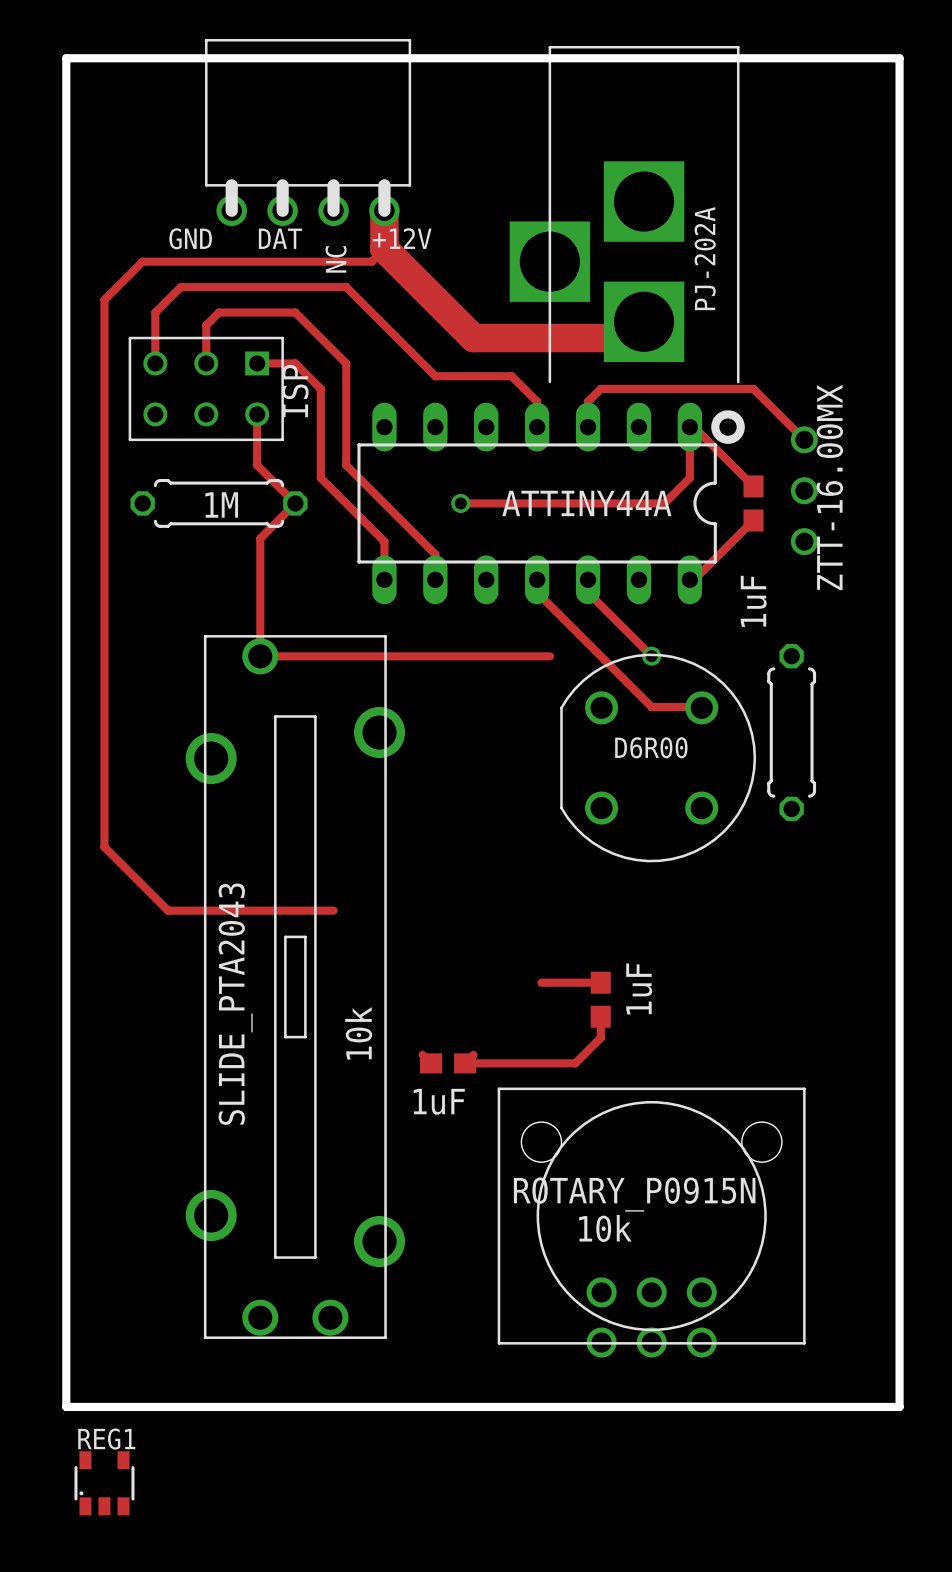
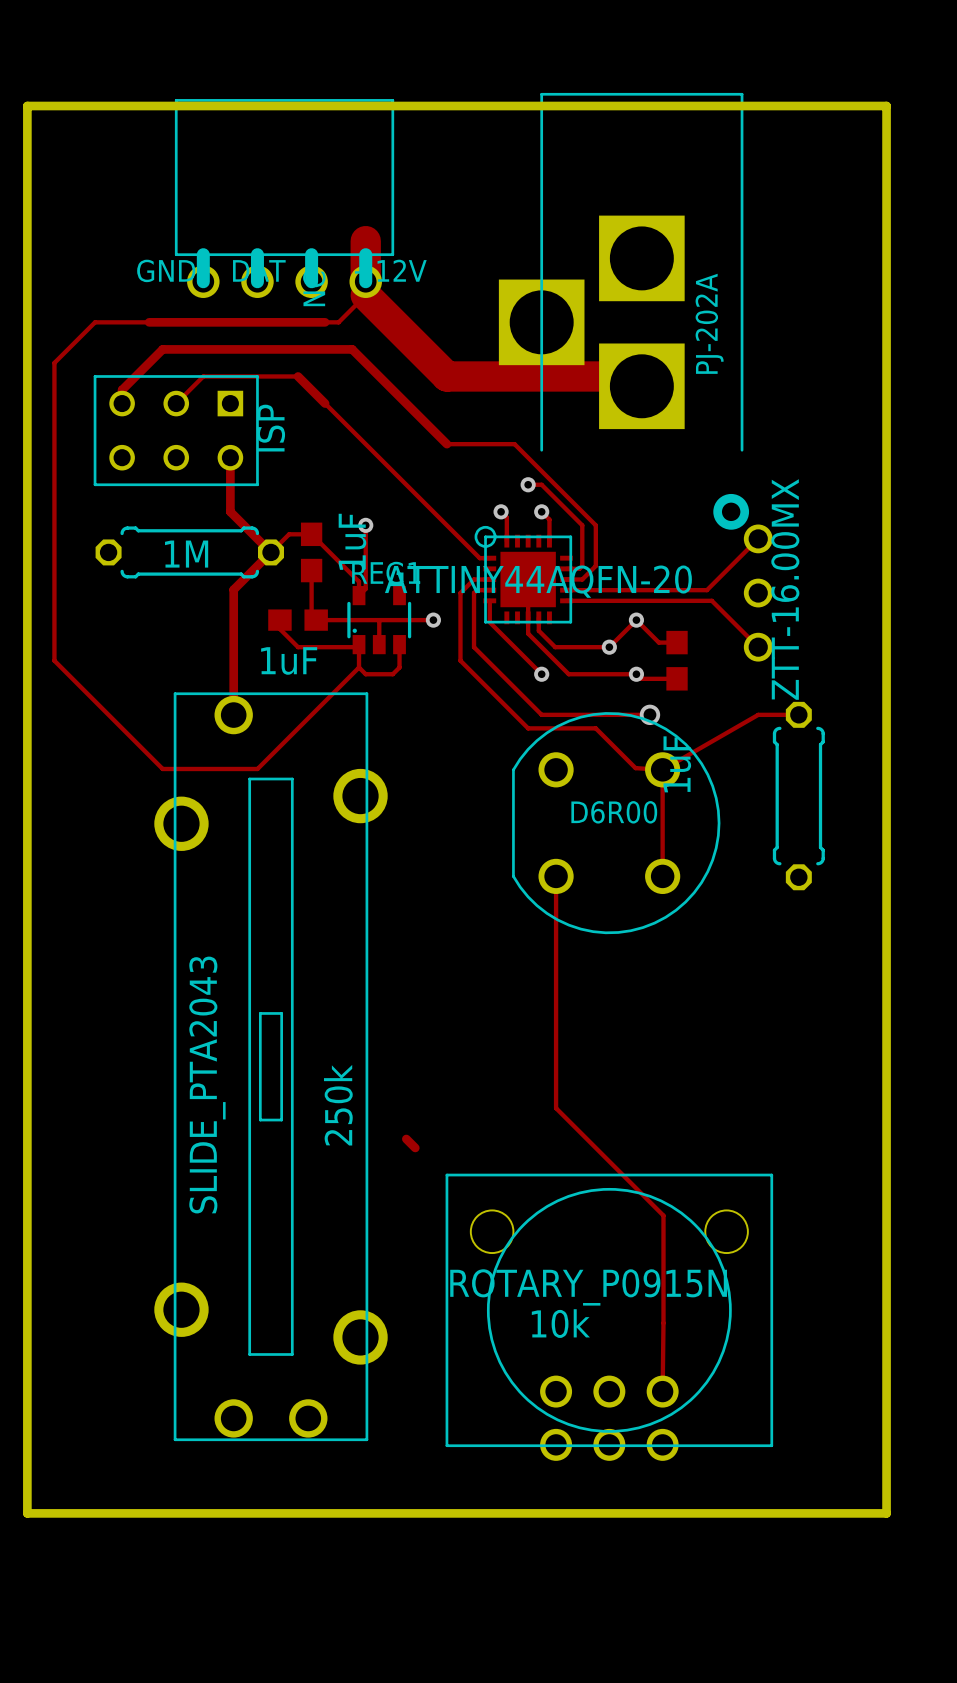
board edge: (66, 83) (66, 58) (899, 58) (899, 1406) (874, 1406) -> (27, 106) (886, 106) (886, 1513)
part position: (308, 132) -> (284, 198)
part position: (624, 214) -> (621, 272)
track: (180, 287) (155, 312) (155, 350) -> (189, 349) (162, 349) (122, 390)
track: none -> (149, 322) (95, 322) (54, 362) (54, 660) (162, 768) (257, 768) (359, 667)
track: (346, 287) (371, 312) -> (325, 322) (338, 322) (365, 295) (446, 376) (460, 376)
track: (219, 312) (206, 325) (206, 363) -> (298, 376) (203, 376) (176, 403)
track: (295, 312) (320, 338) -> (270, 349) (352, 349)
track: (473, 338) (384, 248) (371, 261) (142, 261) (104, 299) (104, 847) (168, 910) (333, 910) -> none
track: (257, 363) (295, 363) (320, 388) (320, 478) (384, 541) (384, 579) -> none
track: (346, 363) (346, 465) (435, 554) (435, 579) -> (325, 403) (479, 558) (489, 558)
track: (435, 376) (511, 376) (537, 401) (537, 427) -> (419, 417) (446, 444) (514, 444) (595, 525) (595, 565) (582, 579) (566, 579)
track: (588, 427) (588, 401) (600, 388) (753, 388) (804, 439) -> none
drawing position: (728, 427) -> (731, 511)
track: none -> (528, 484) (541, 484) (582, 525) (582, 565) (579, 568) (566, 568)
via: none -> (528, 484)
track: none -> (501, 511) (506, 517) (506, 541)
via: none -> (501, 511)
track: none -> (541, 511) (549, 519) (549, 541)
via: none -> (541, 511)
track: none -> (365, 525) (365, 588) (359, 595) (359, 581) (311, 534) (289, 534) (270, 552)
via: none -> (365, 525)
track: (753, 486) (694, 427) (689, 427) (689, 478) (664, 503) (460, 503) -> none
track: none -> (758, 538) (706, 590) (566, 590)
part position: (804, 490) -> (758, 593)
part: none -> 1uF (311, 552)
via: (460, 503) -> none
part: ATTINY44A (537, 503) -> none
part position: (753, 503) -> (677, 660)
track: none -> (311, 570) (311, 615) (316, 620) (433, 620)
track: (753, 520) (694, 579) (689, 579) -> none
part: none -> ATTINY44AQFN-20 (523, 575)
track: none -> (489, 579) (474, 579) (460, 593) (460, 660) (528, 728) (595, 728) (635, 768) (662, 769)
track: none -> (528, 579) (528, 633) (568, 674) (641, 674)
track: none -> (489, 600) (489, 622) (541, 674)
track: none -> (566, 600) (711, 600) (758, 647)
track: none -> (538, 617) (538, 630) (555, 647) (609, 647) (636, 620) (658, 642) (677, 642)
track: none -> (279, 620) (279, 629) (298, 647) (356, 647) (359, 644) (359, 667)
part: none -> 1uF (298, 620)
track: none -> (379, 620) (379, 644)
via: none -> (433, 620)
via: none -> (636, 620)
track: (537, 579) (537, 592) (651, 707) (700, 707) -> none
track: (588, 579) (588, 592) (651, 656) -> (489, 590) (476, 590) (474, 593) (474, 647) (541, 714) (649, 714)
track: none -> (399, 644) (399, 667) (392, 674) (365, 674) (359, 667)
via: none -> (609, 647)
via: none -> (541, 674)
track: none -> (636, 674) (641, 678) (677, 678)
via: none -> (636, 674)
track: (260, 656) (550, 656) -> none
track: none -> (798, 714) (758, 714) (662, 769)
track: none -> (662, 769) (662, 876)
part position: (658, 757) -> (616, 823)
track: none -> (556, 876) (556, 1108) (663, 1215) (662, 1391)
track: (541, 982) (600, 982) -> none
part: 1uF (600, 999) -> none
track: (600, 1016) (600, 1037) (575, 1063) (465, 1063) (473, 1054) -> none
SLIDE_PTA2043 value: 10k (358, 1033) -> 250k (338, 1105)
part: 1uF (448, 1063) -> none
ROTARY_P0915N name position: ROTARY_P0915N (634, 1194) -> ROTARY_P0915N (588, 1287)
ROTARY_P0915N position: (651, 1222) -> (609, 1317)
REG1 position: (104, 1483) -> (379, 620)

